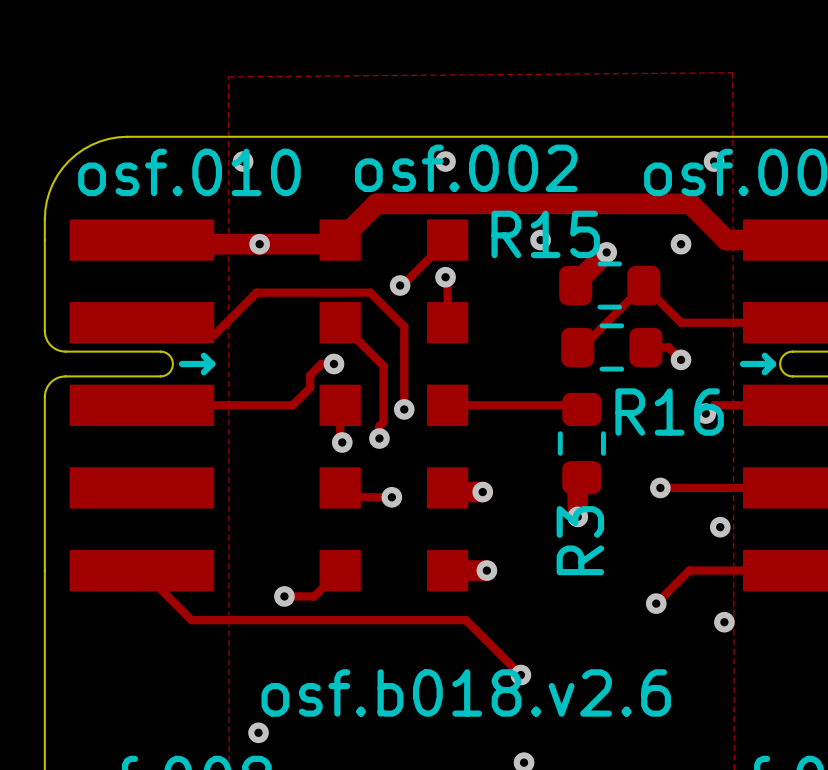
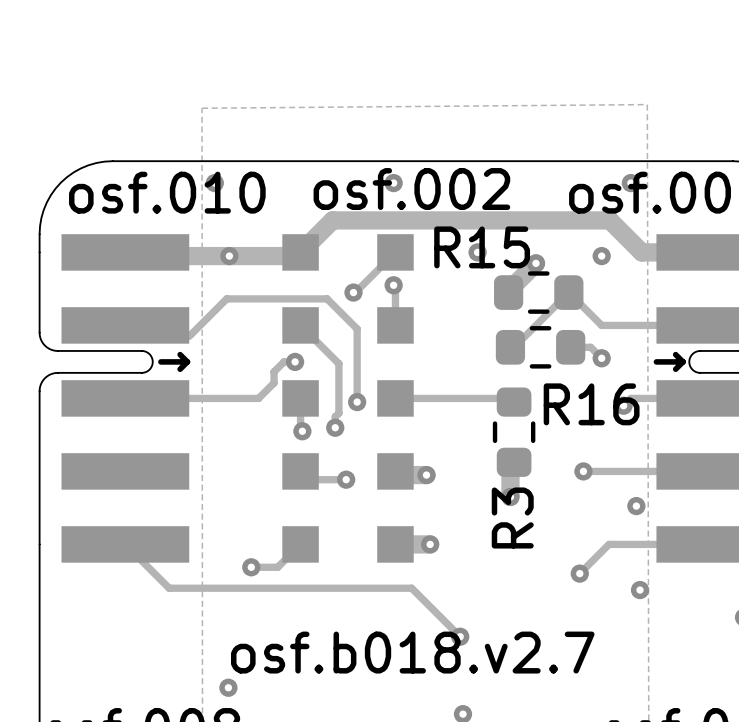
text: osf.b018.v2.6 (466, 692) -> osf.b018.v2.7 (412, 652)

